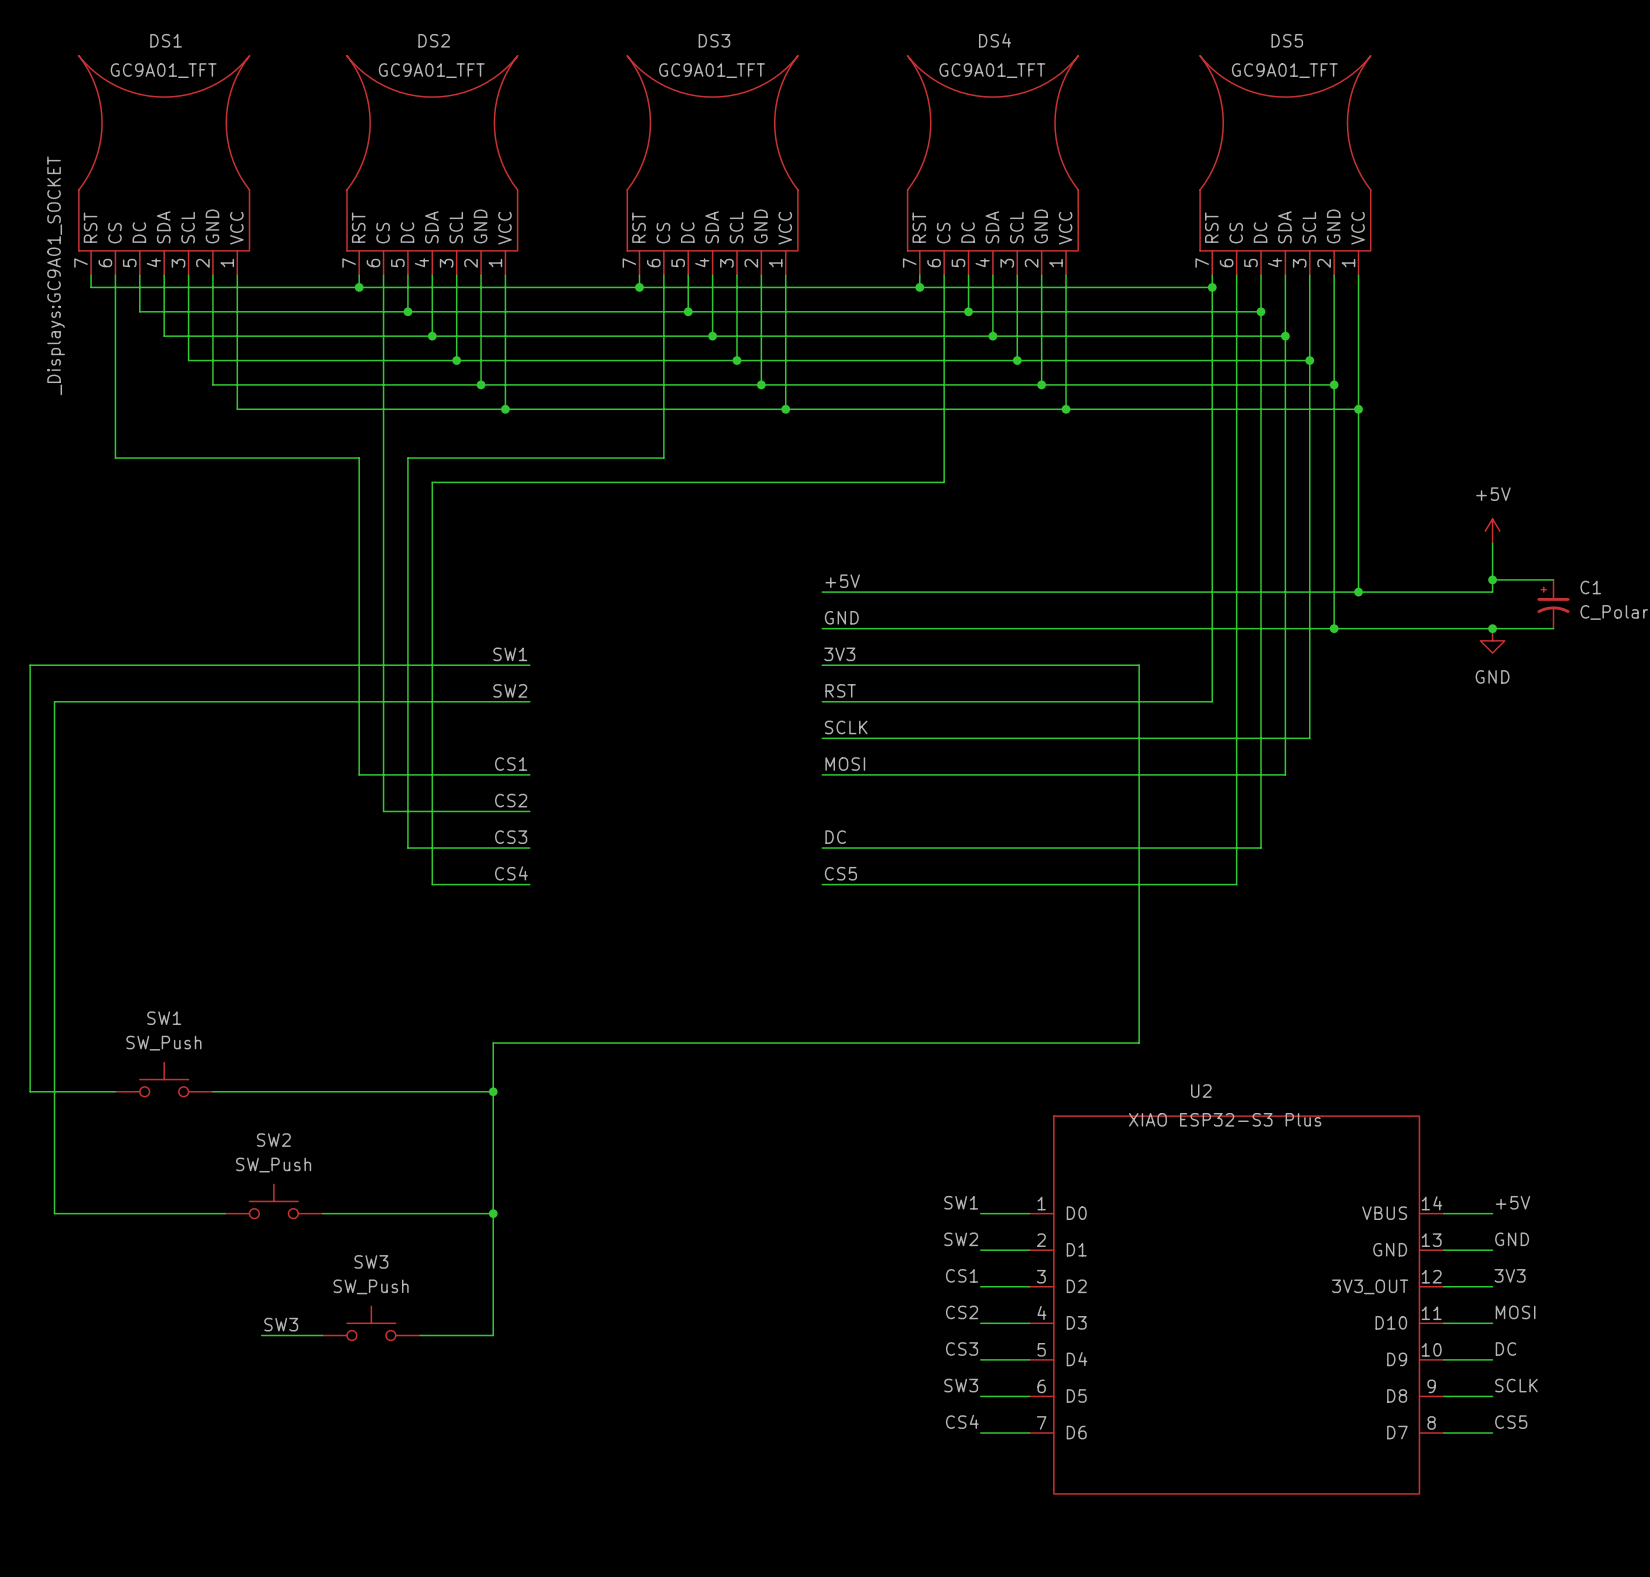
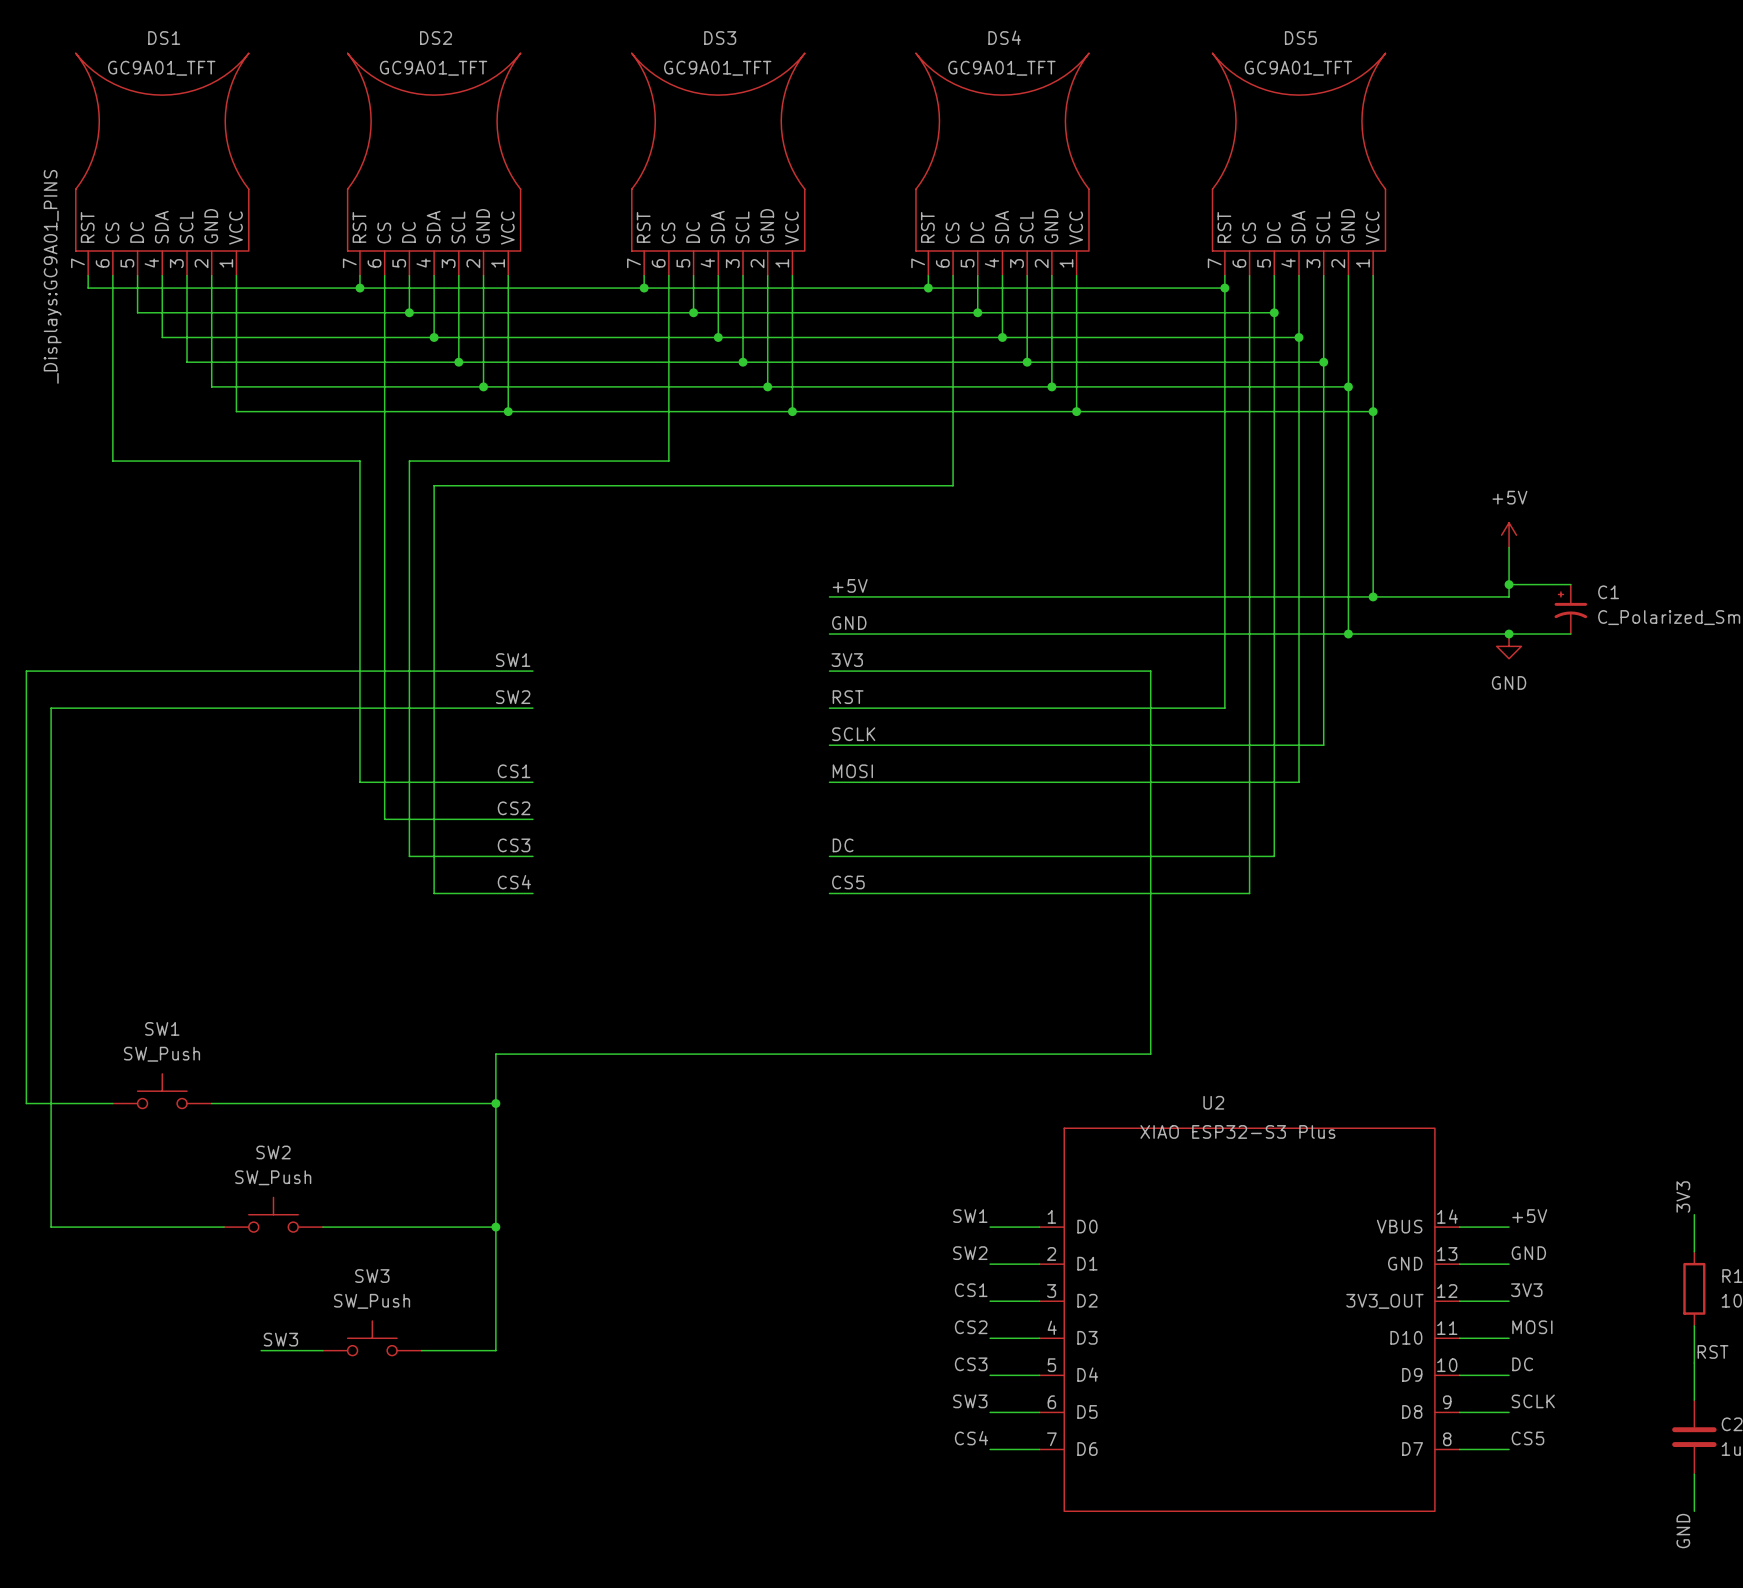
DS1 text: _Displays:GC9A01_SOCKET (56, 275) -> _Displays:GC9A01_PINS (52, 276)

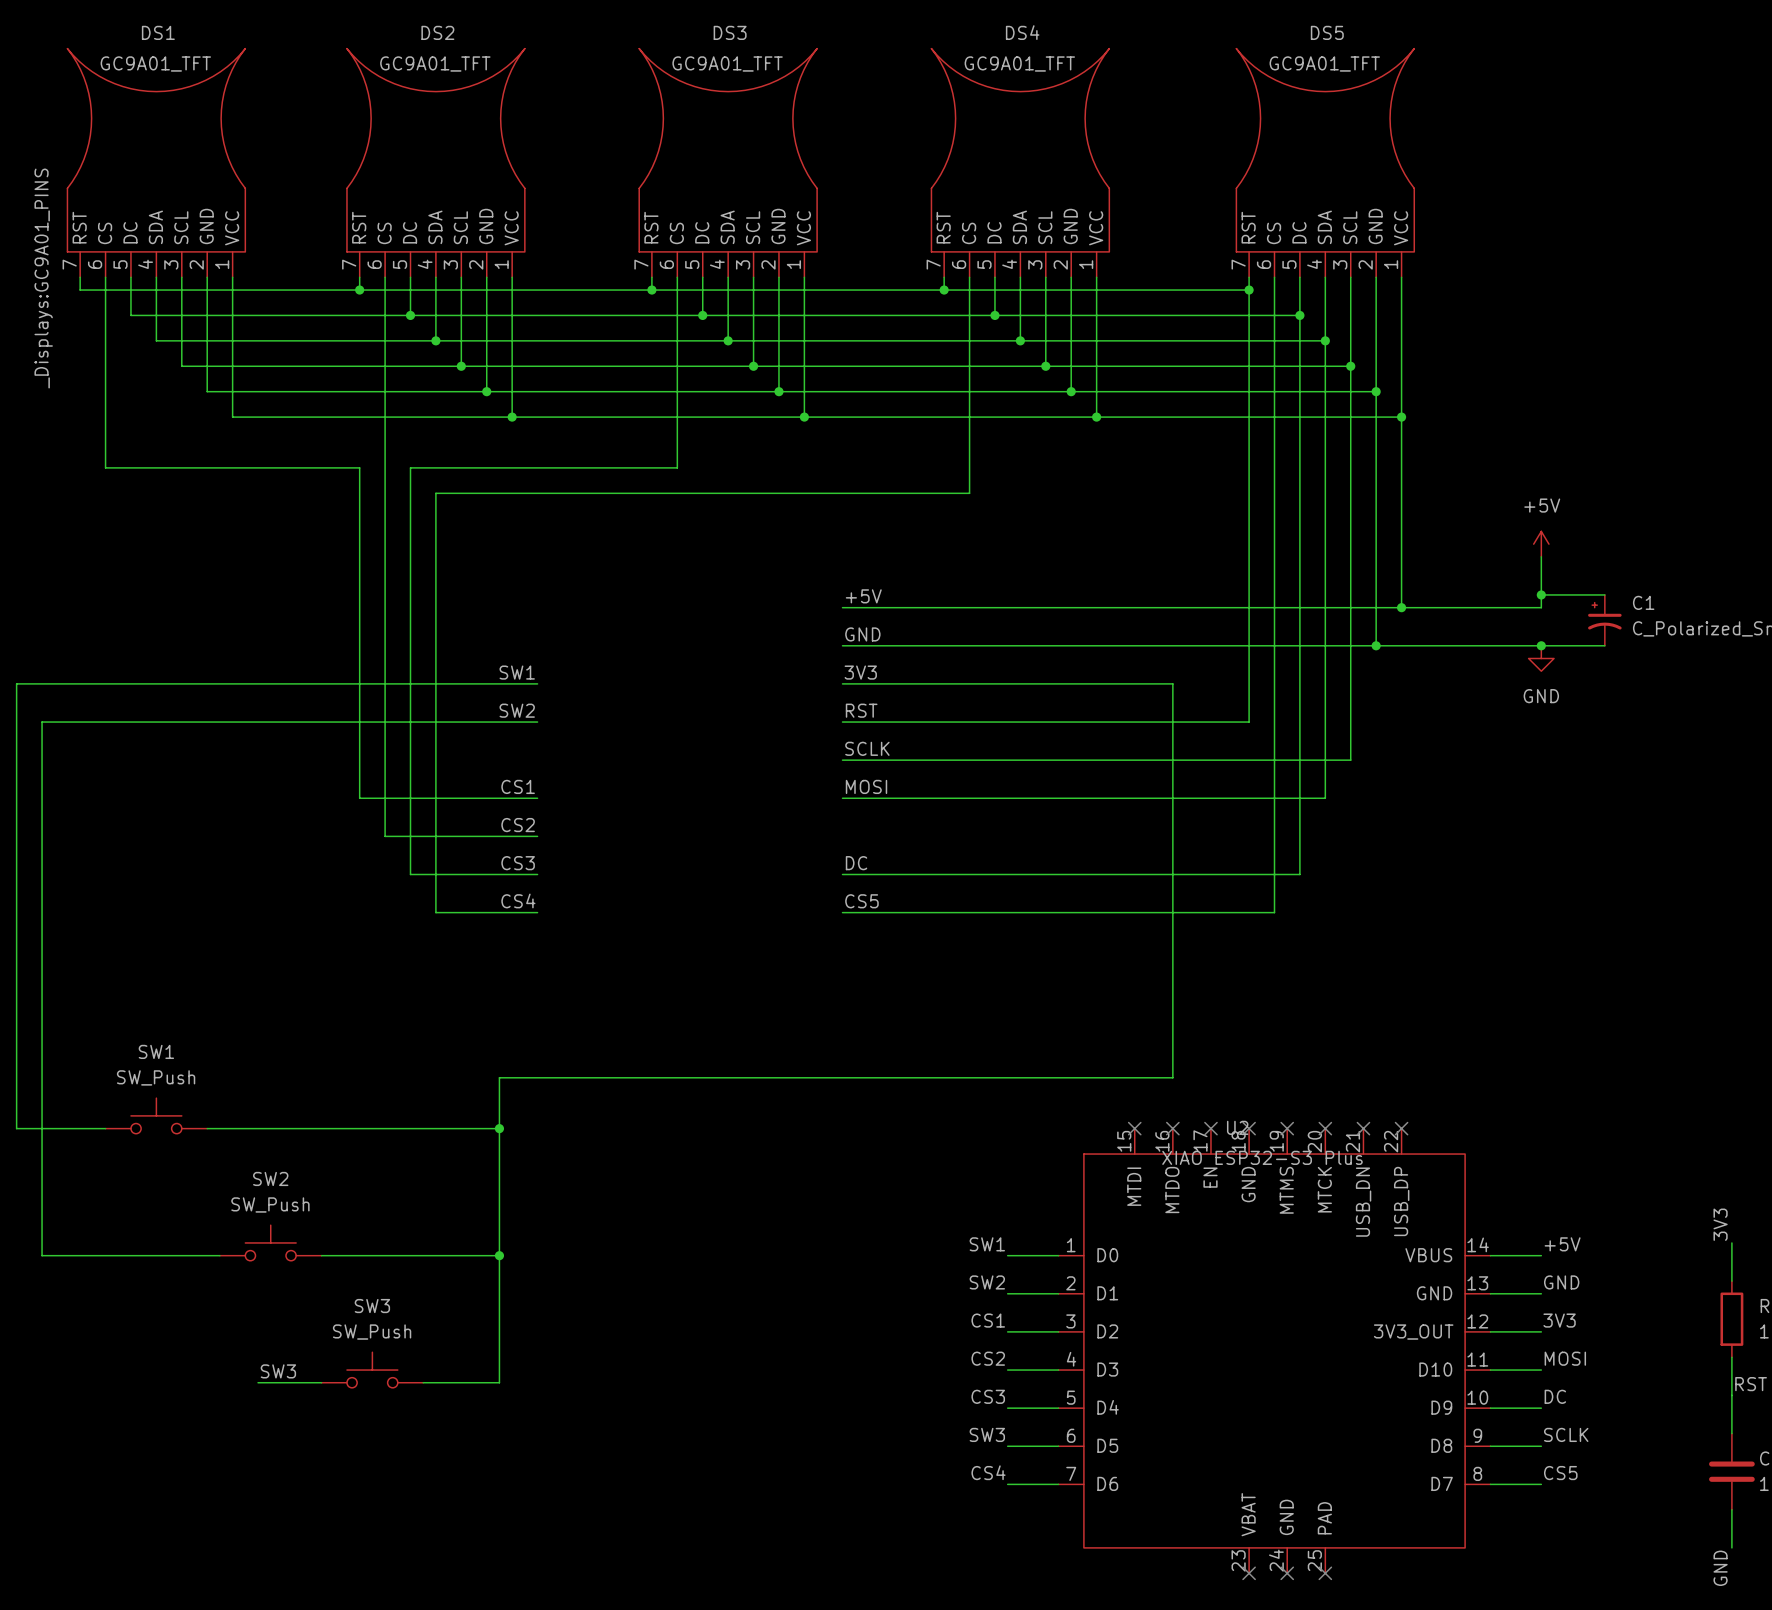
no-connect mark: none -> (1134, 1128)
no-connect mark: none -> (1172, 1128)
no-connect mark: none -> (1210, 1128)
no-connect mark: none -> (1249, 1128)
no-connect mark: none -> (1287, 1128)
no-connect mark: none -> (1325, 1128)
no-connect mark: none -> (1363, 1128)
no-connect mark: none -> (1401, 1128)
U2 symbol: [1039, 1128, 1460, 1512] -> [1058, 1128, 1491, 1574]
no-connect mark: none -> (1249, 1573)
no-connect mark: none -> (1287, 1573)
no-connect mark: none -> (1325, 1573)

